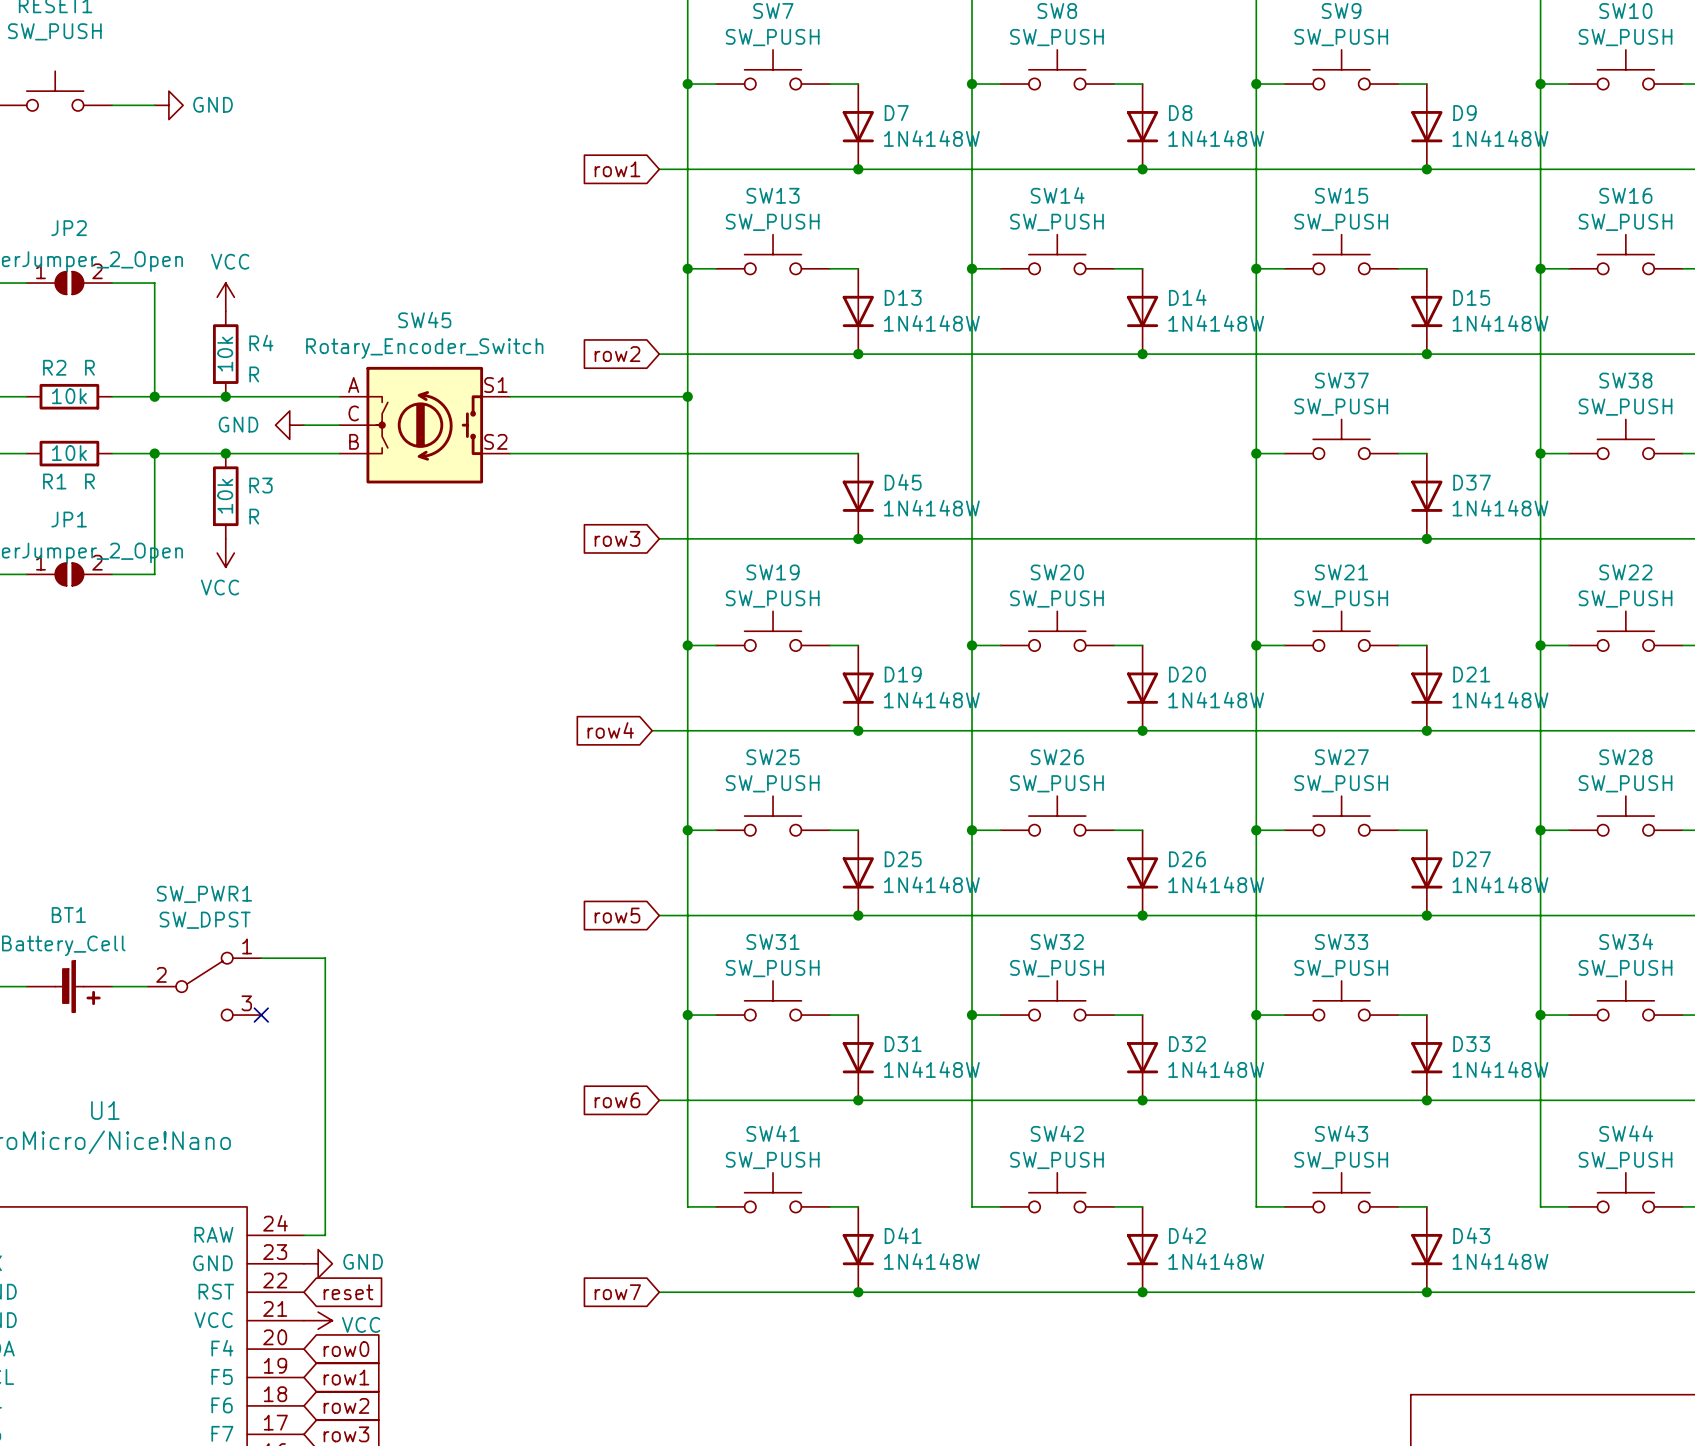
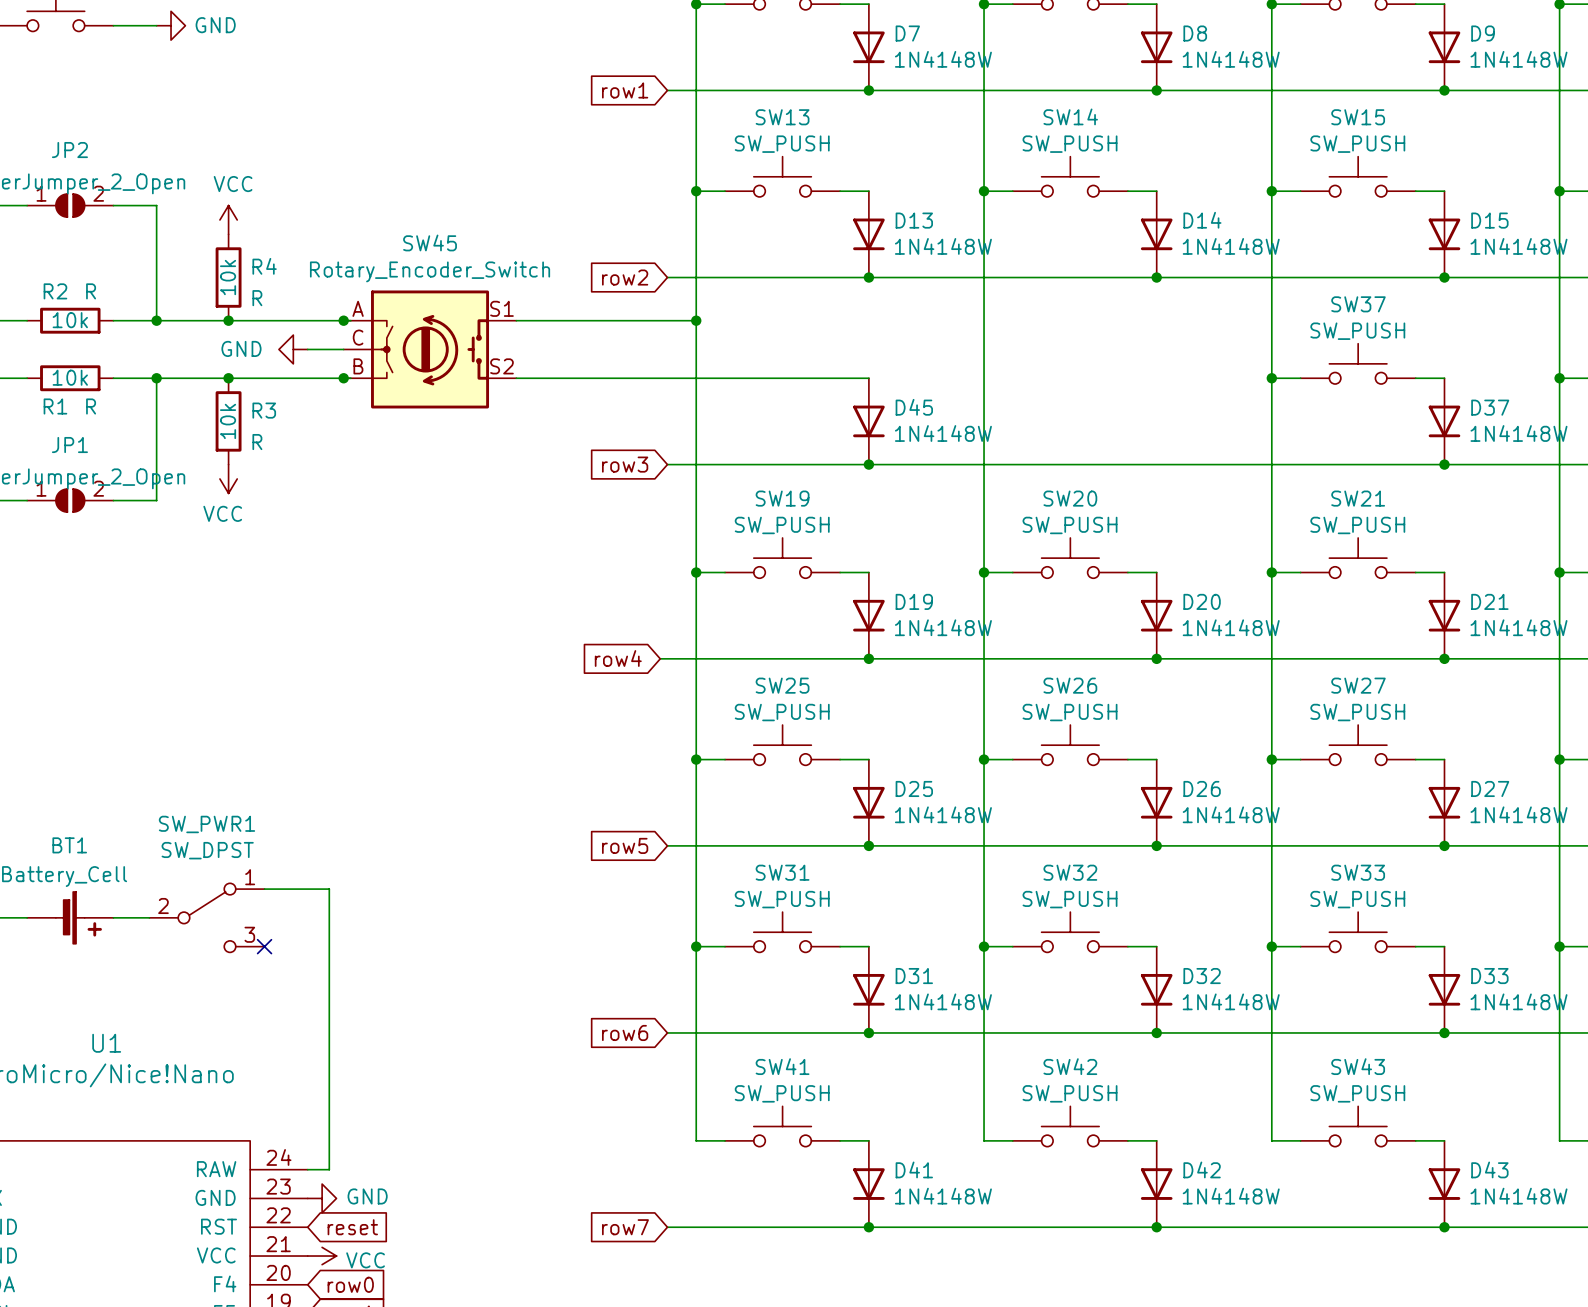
junction: none -> (343, 320)
junction: none -> (343, 378)

